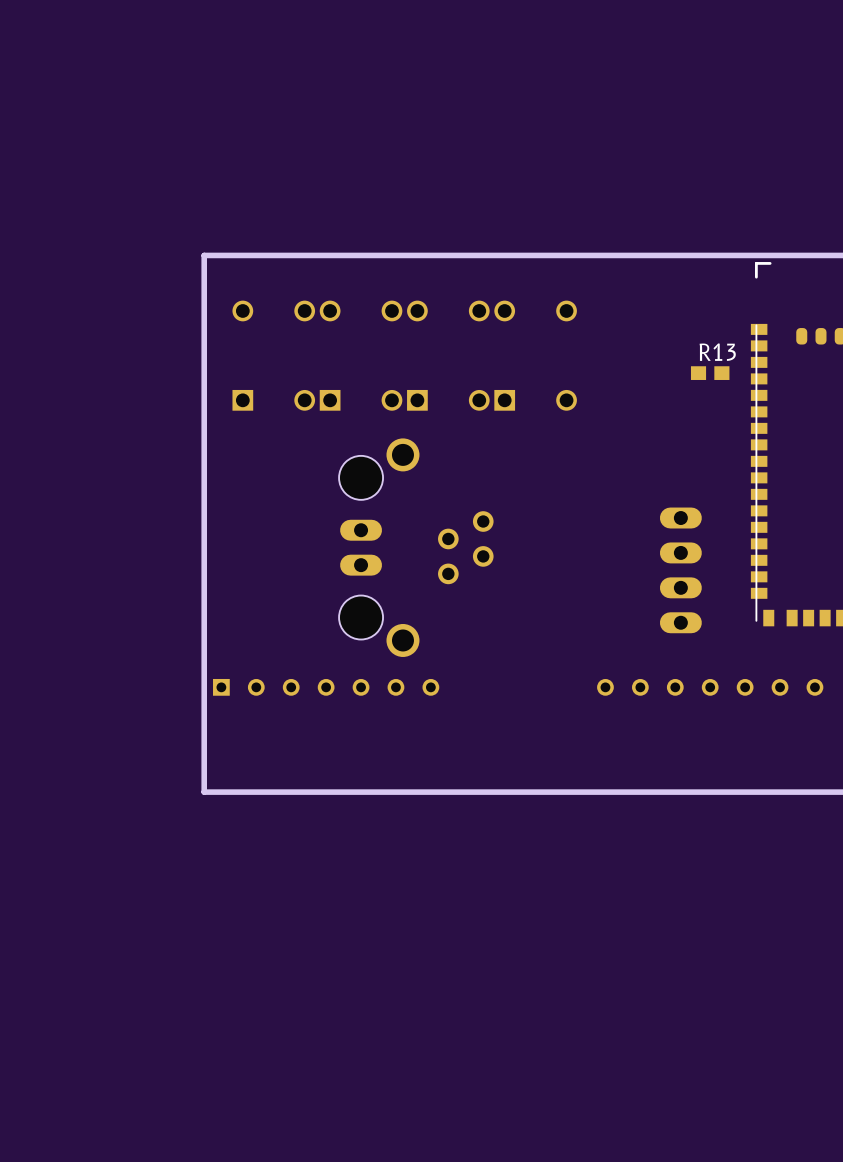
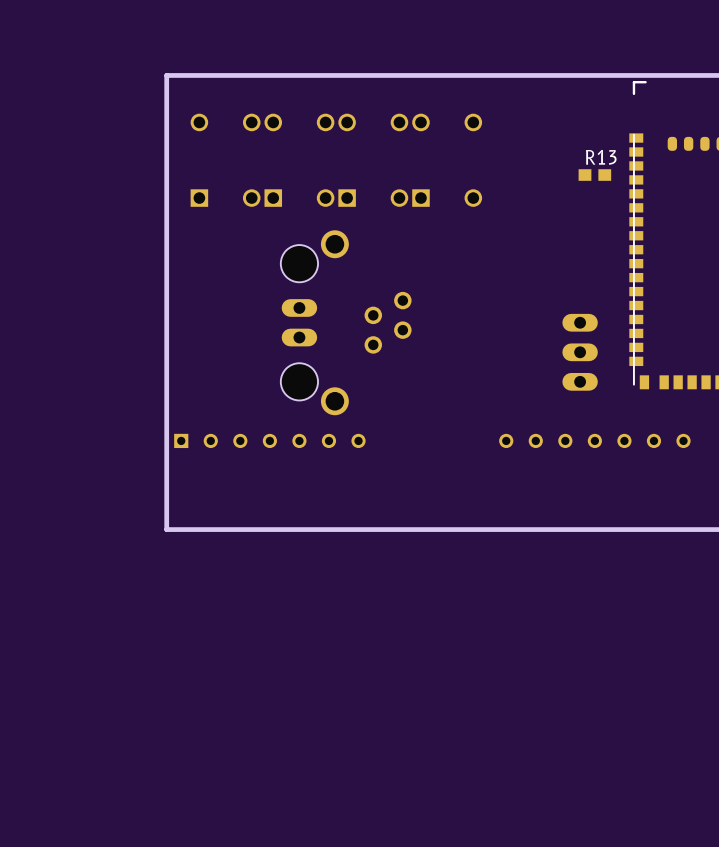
part: (680, 570) -> none
part: none -> (580, 352)

